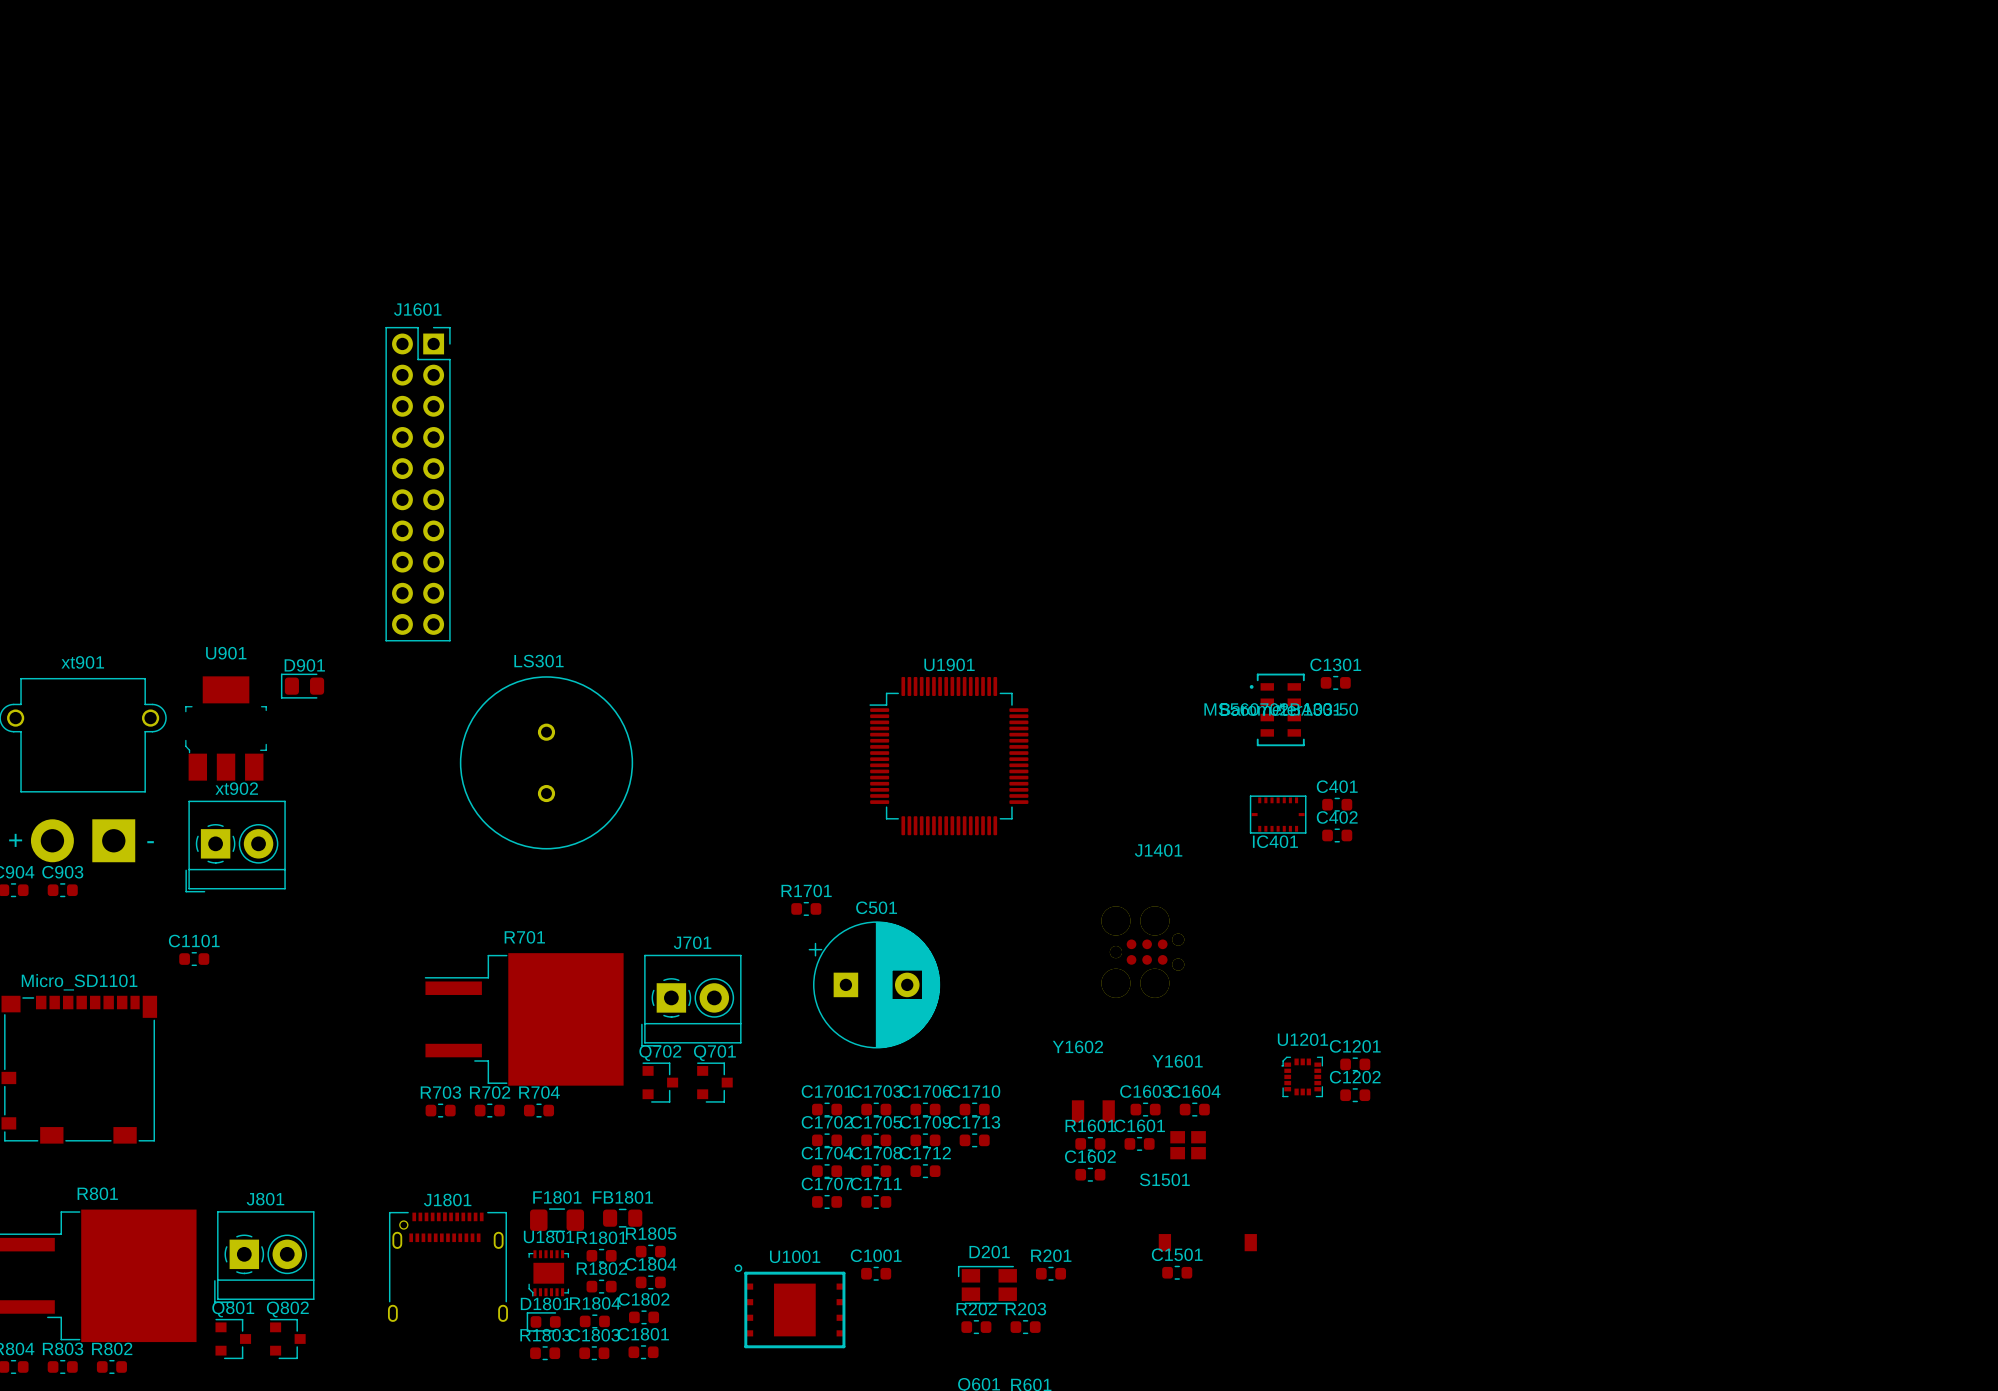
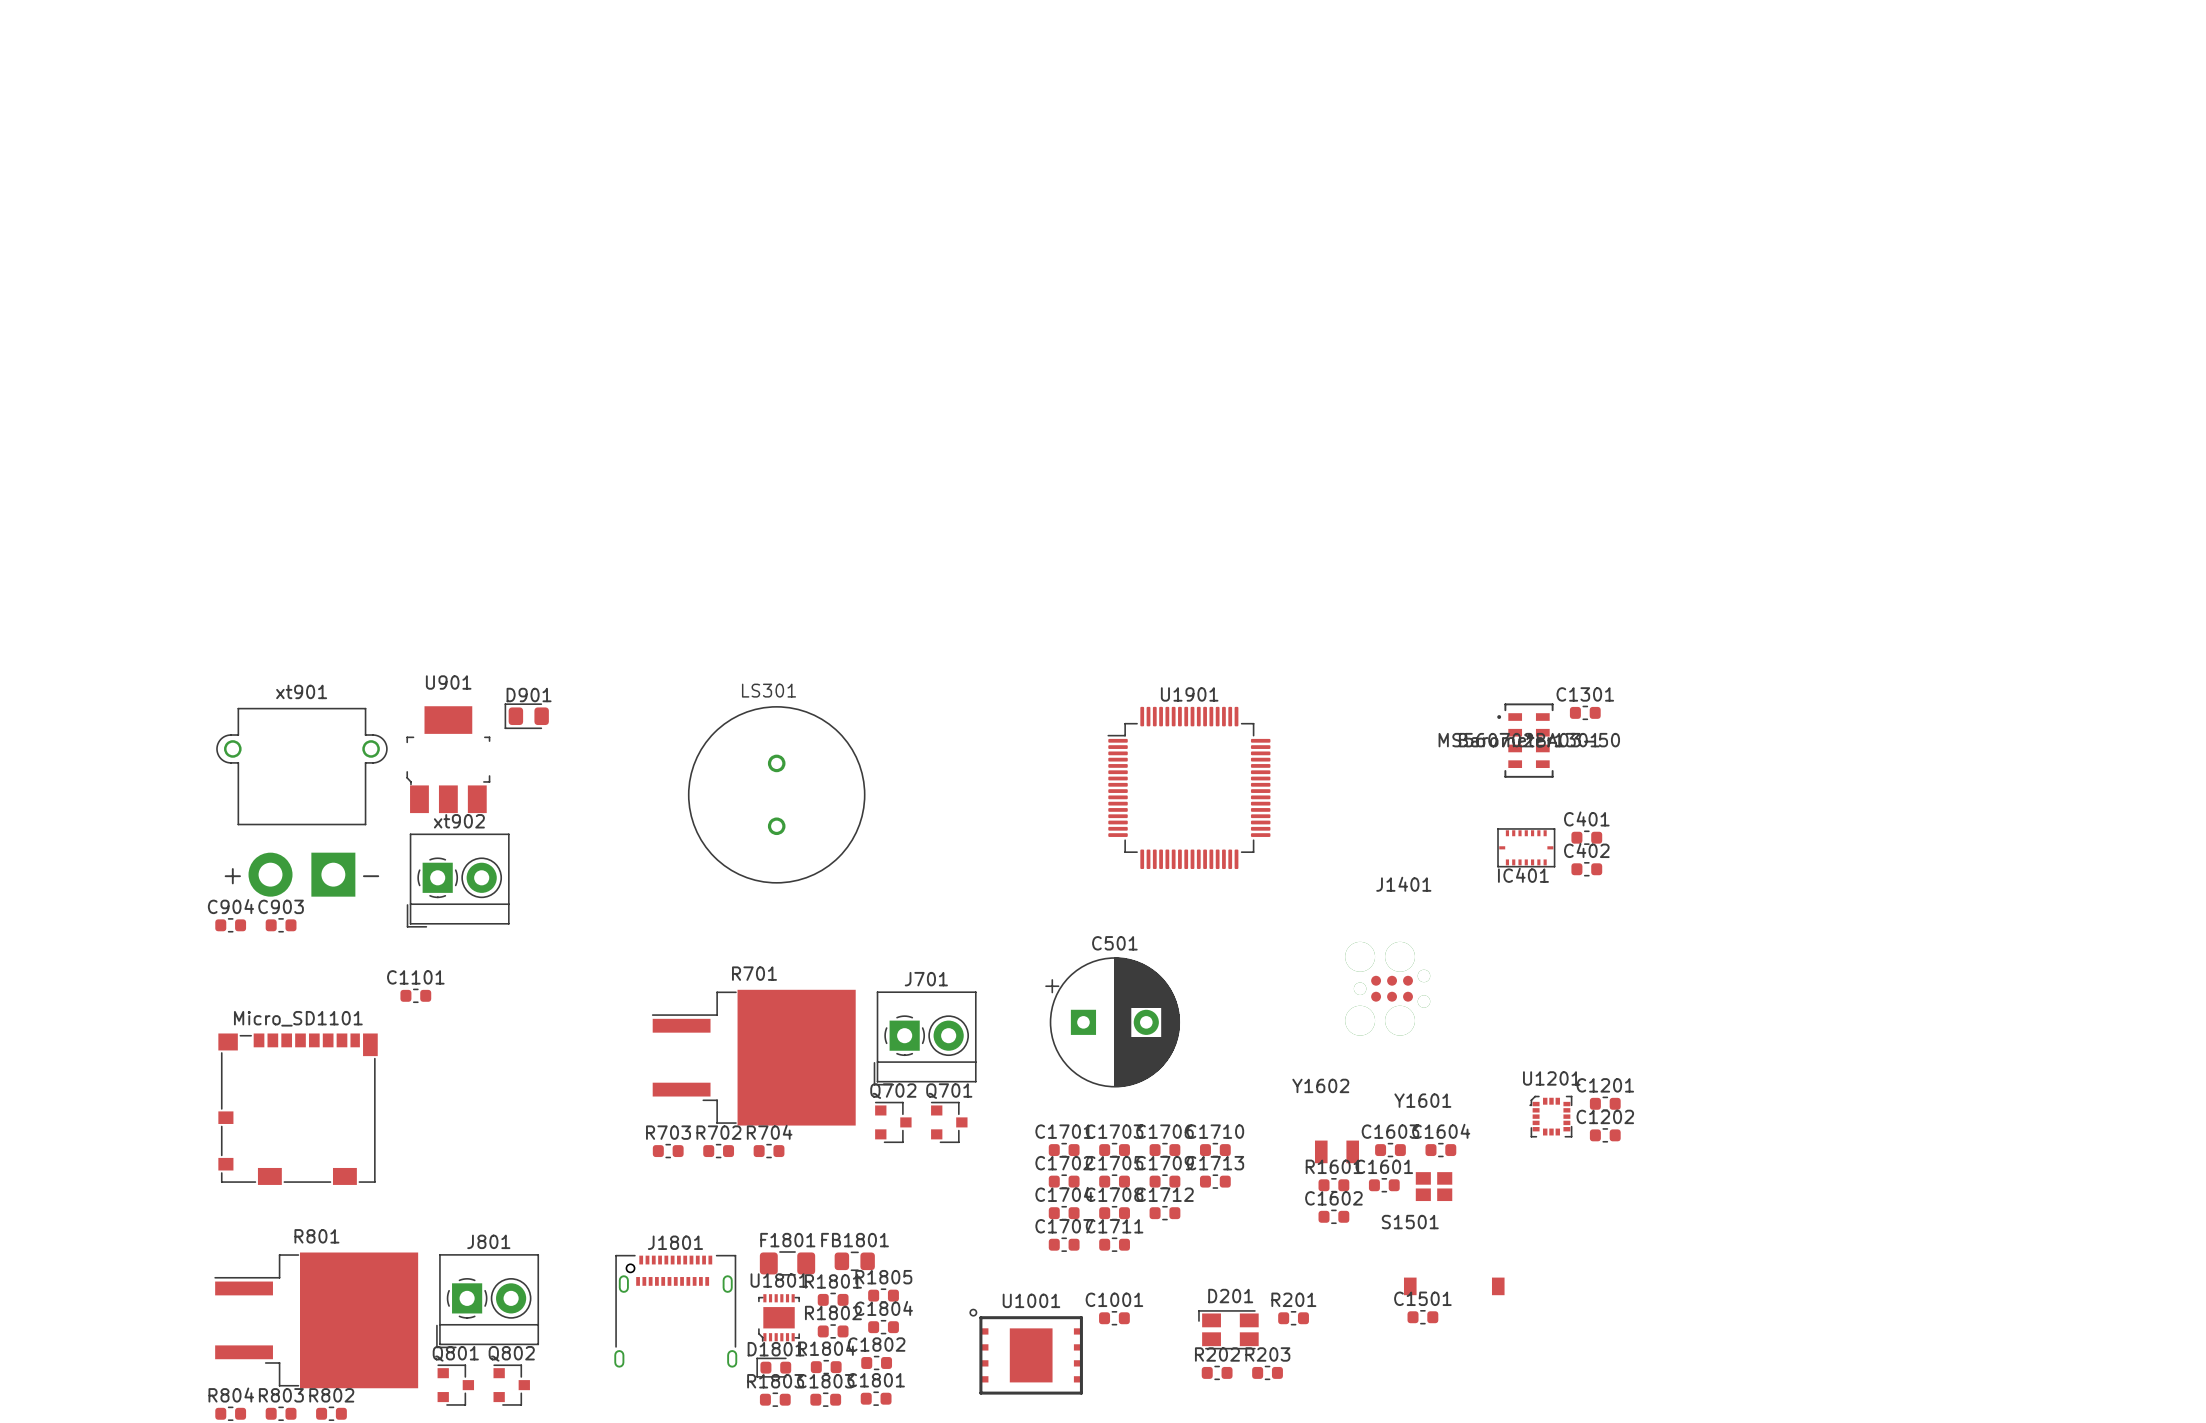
J1601: (418, 484) -> none
R1701: (806, 908) -> none

